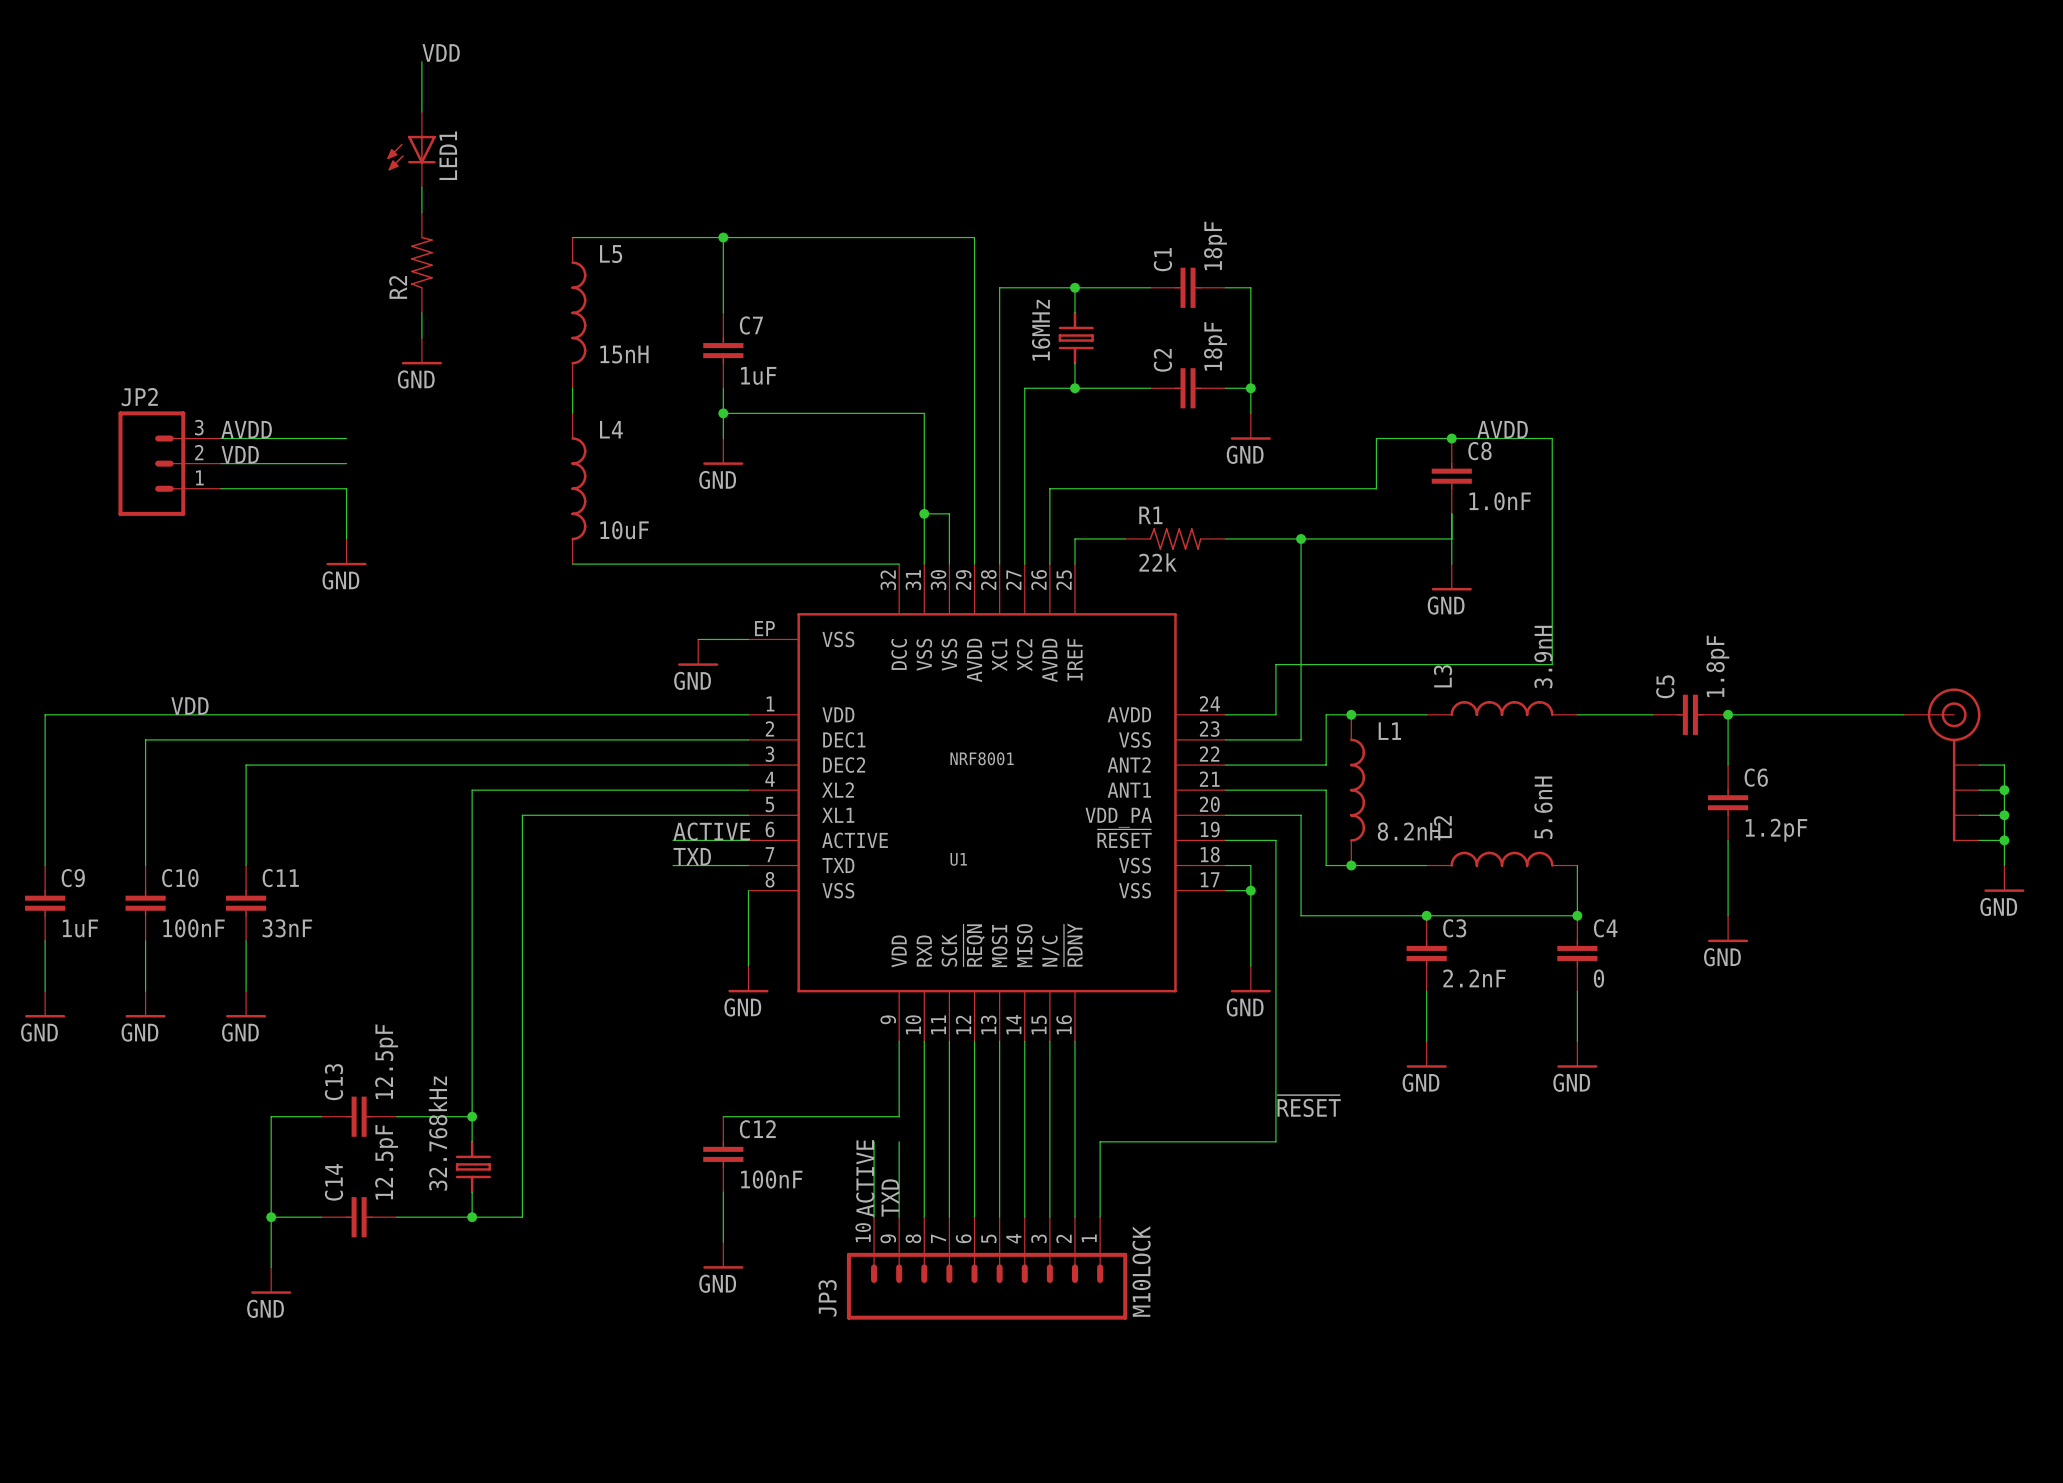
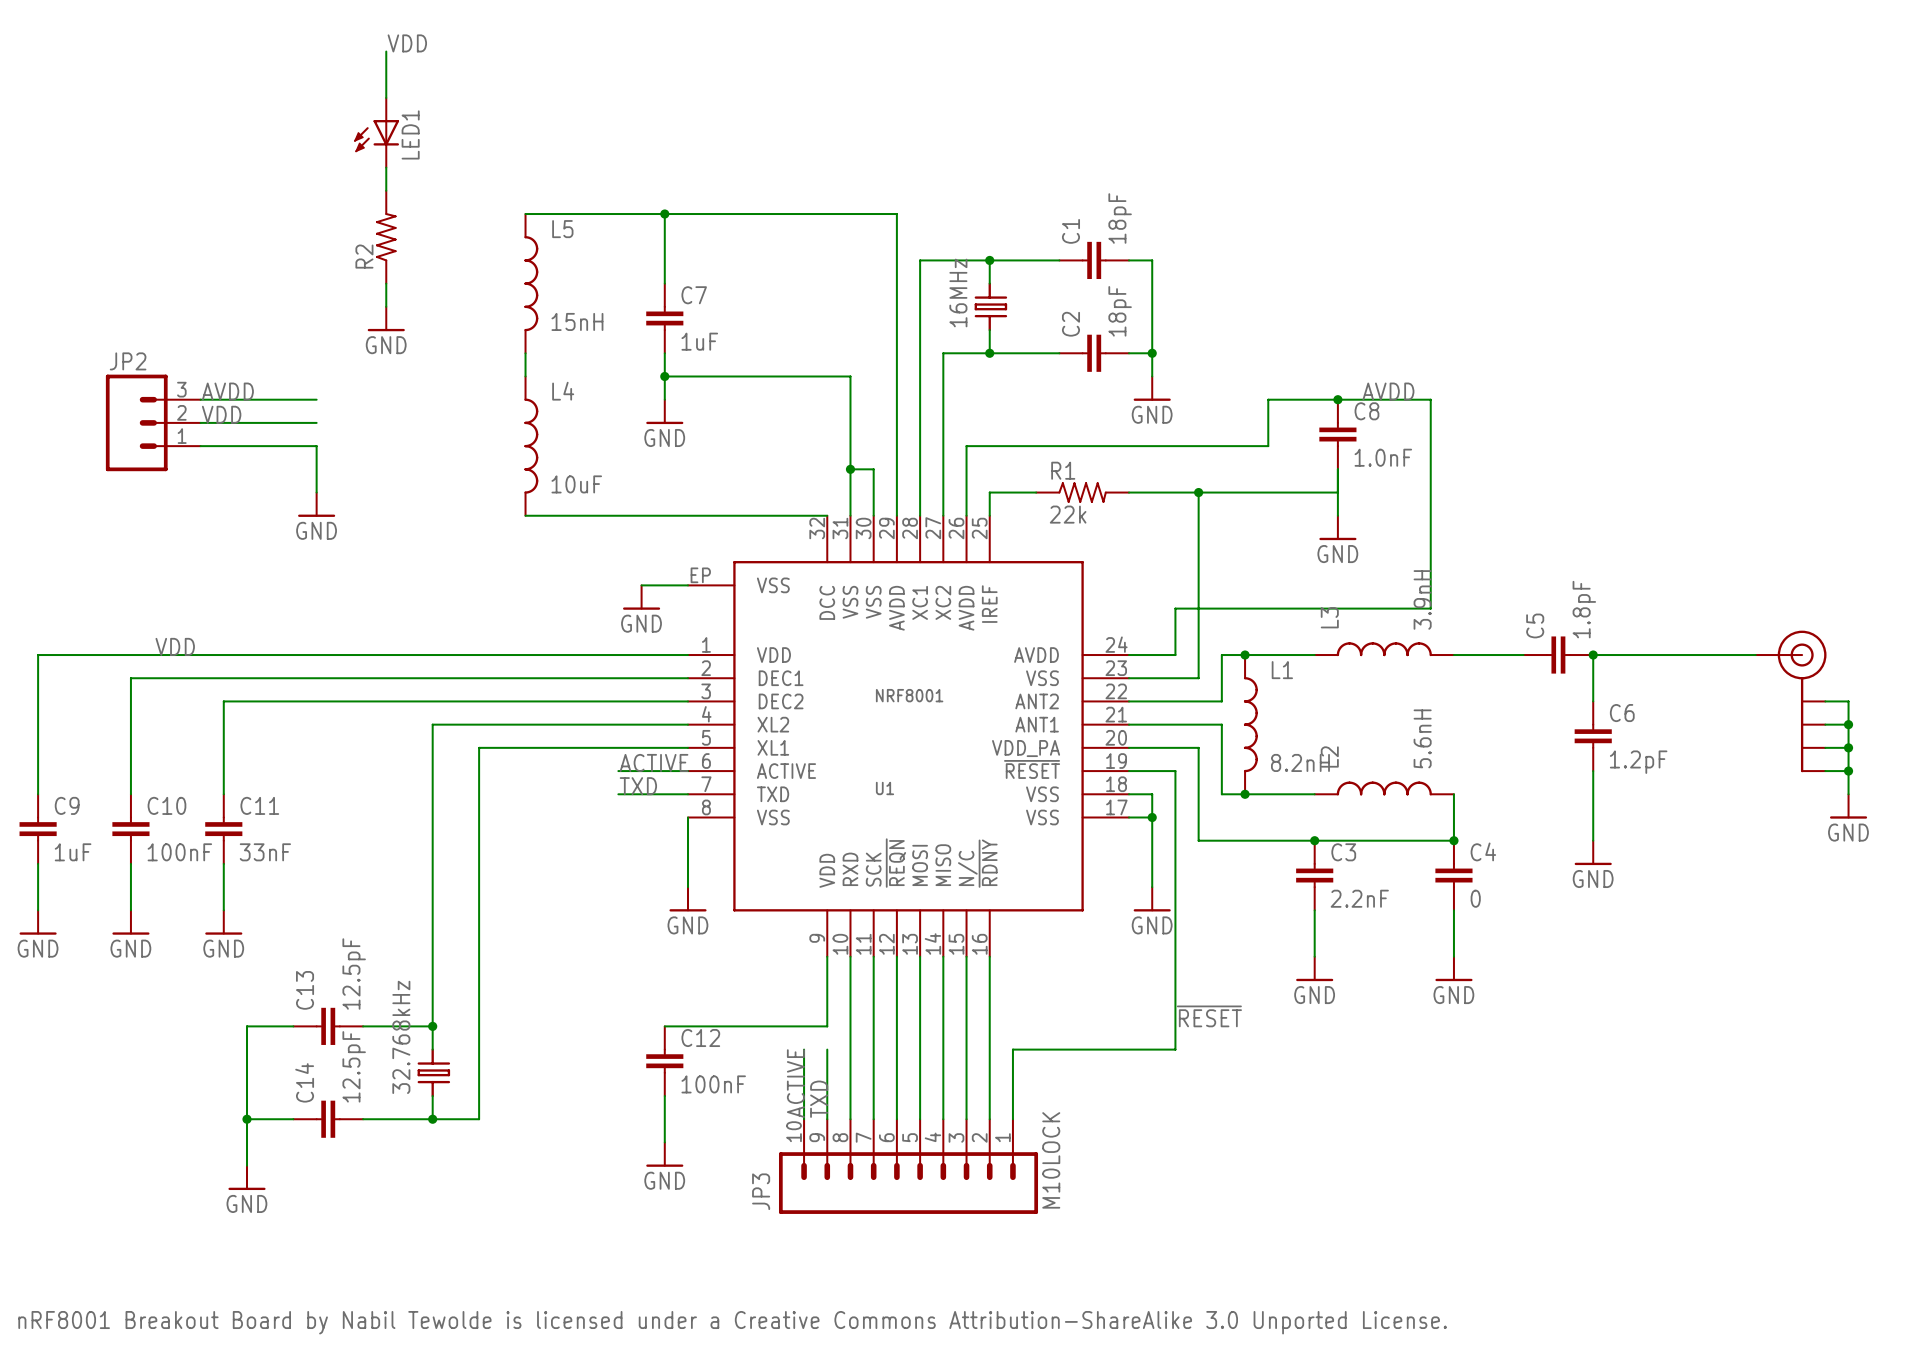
text: none -> nRF8001 Breakout Board by Nabil Tewolde is licensed under a Creative Commons Attribution-ShareAlike 3.0 Unported License. (732, 1322)

